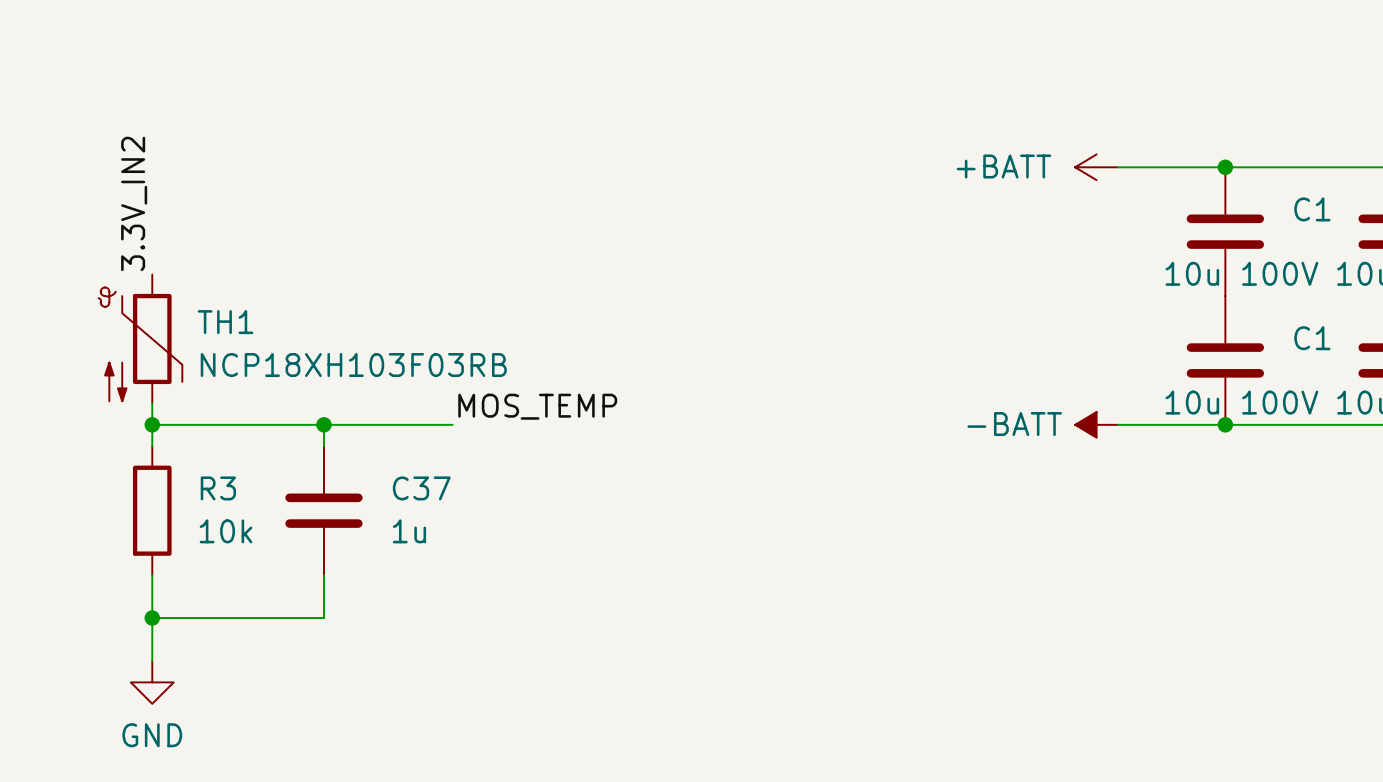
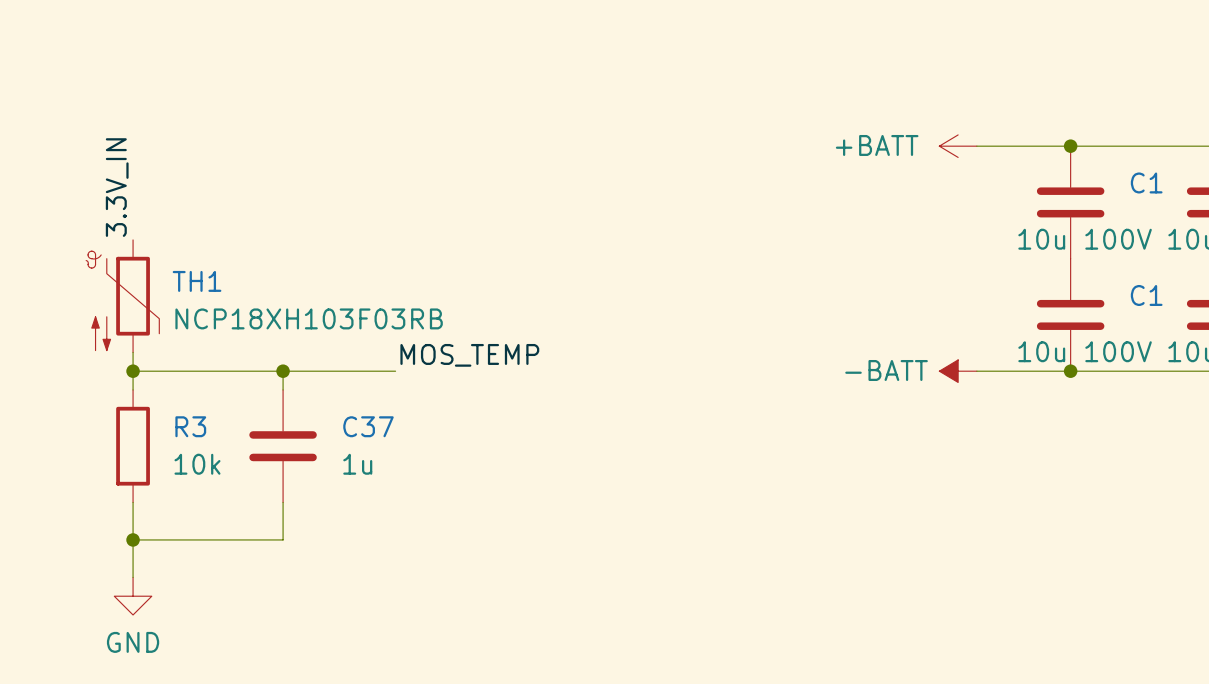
label: 3.3V_IN2 (134, 203) -> 3.3V_IN (117, 187)

